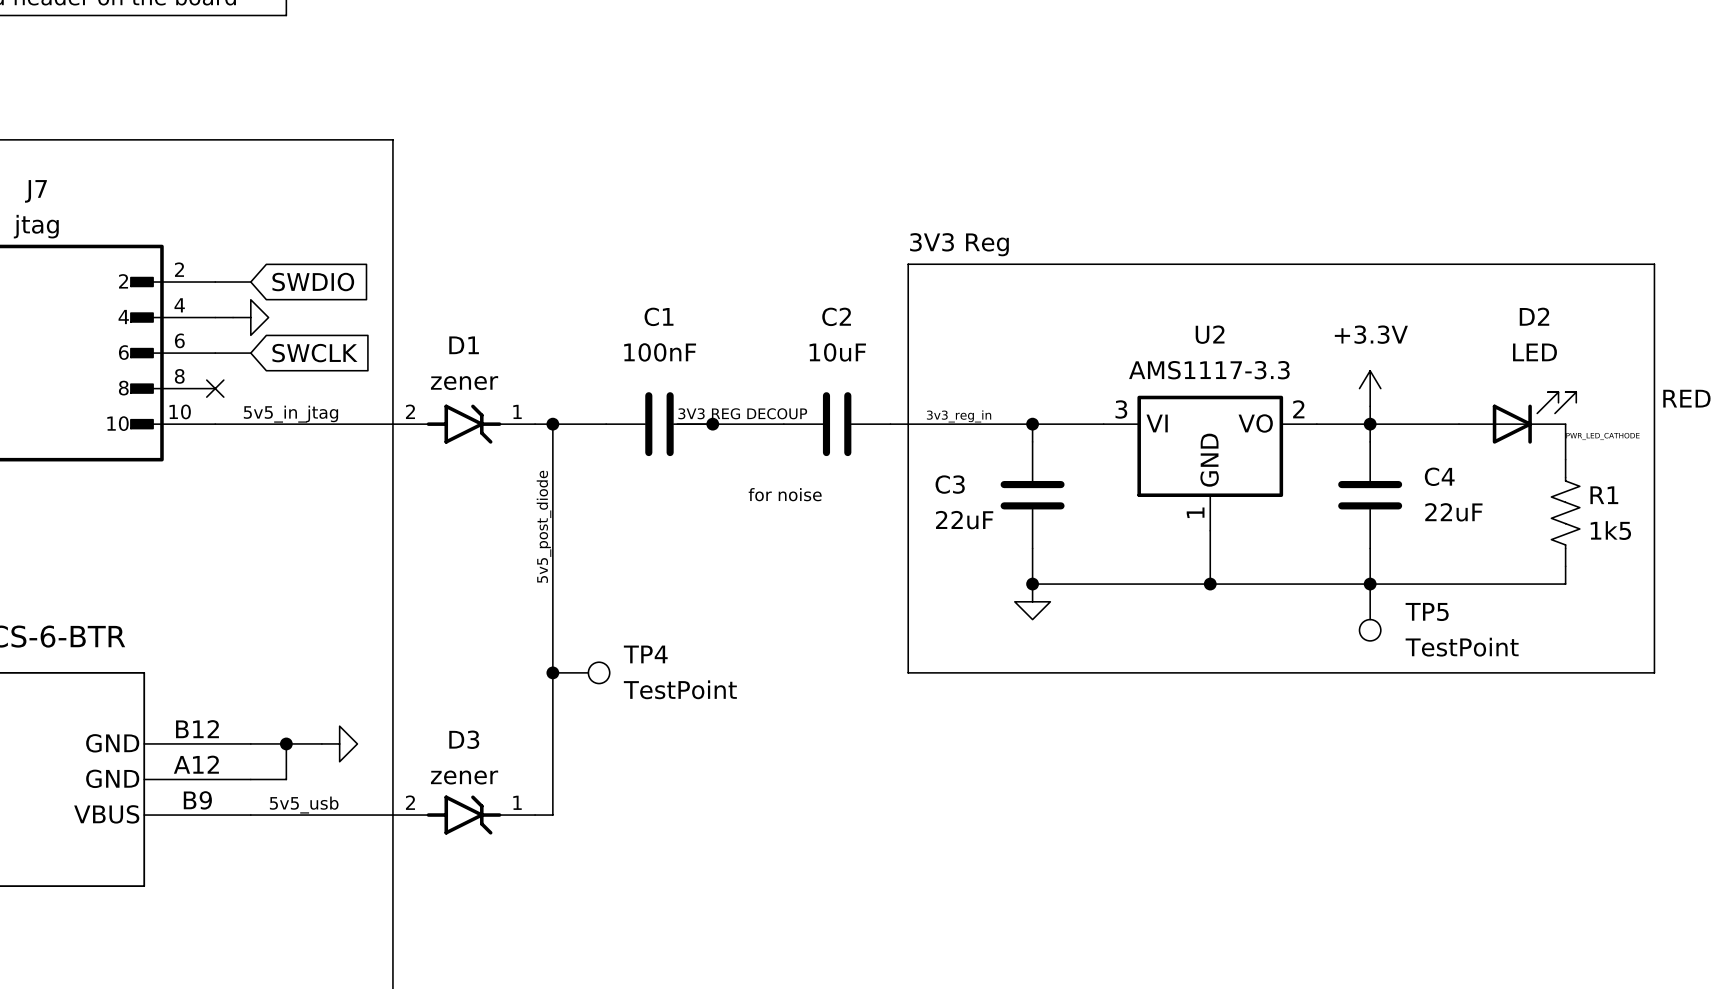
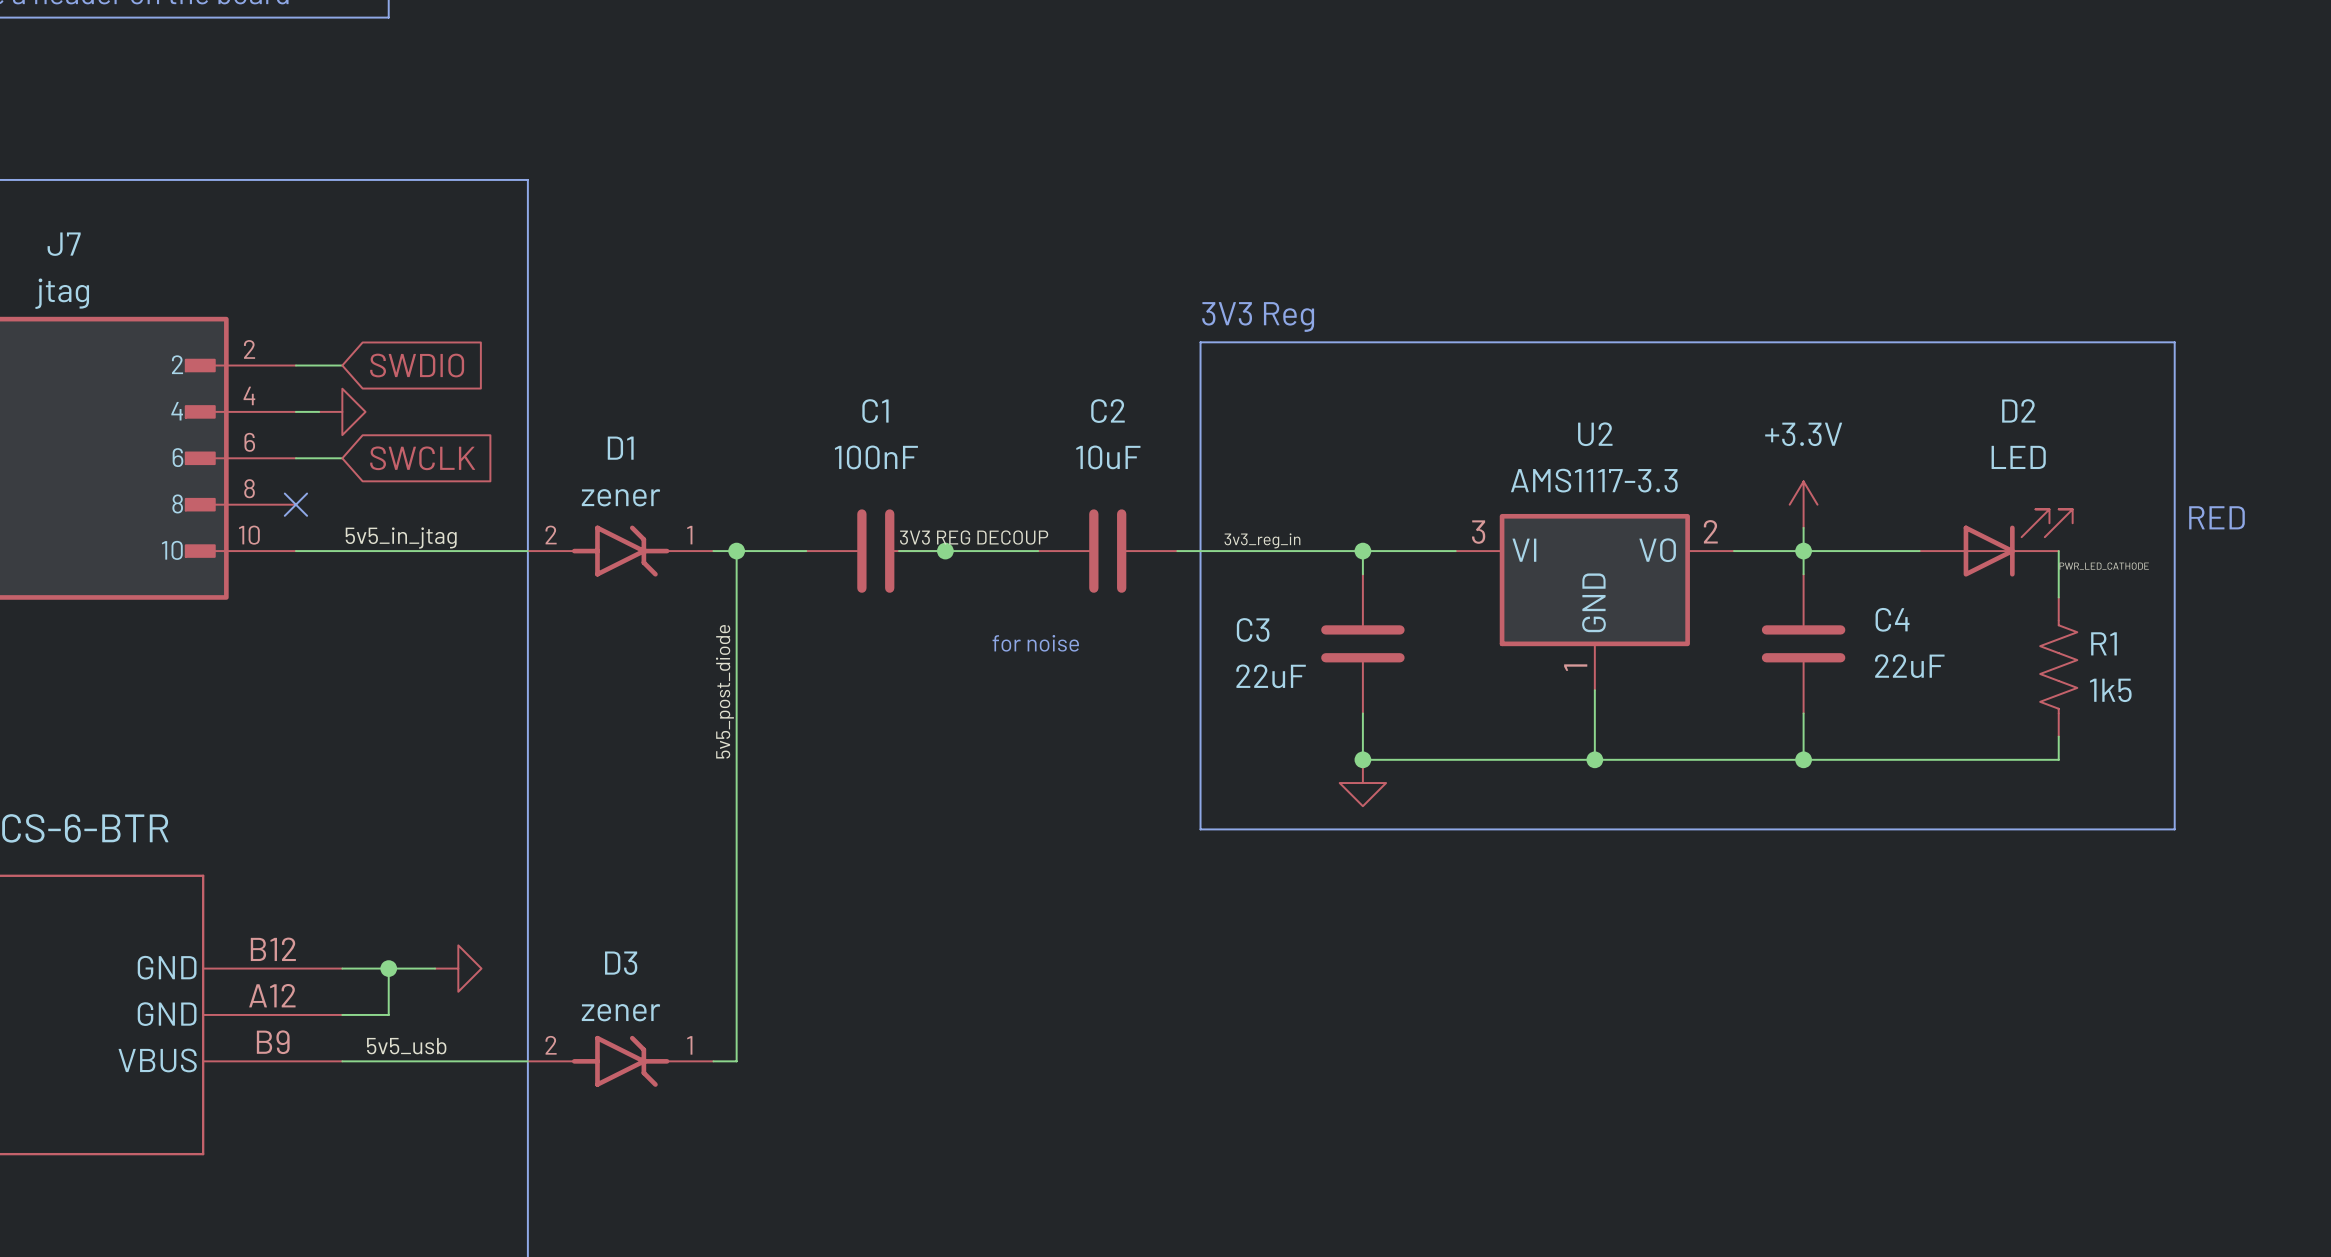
TP5: TestPoint (1370, 612) -> none
line: (908, 637) (908, 672) (1654, 672) (1654, 637) -> (1200, 829) (2174, 829)
junction: (552, 672) -> none
TP4: TestPoint (581, 672) -> none

